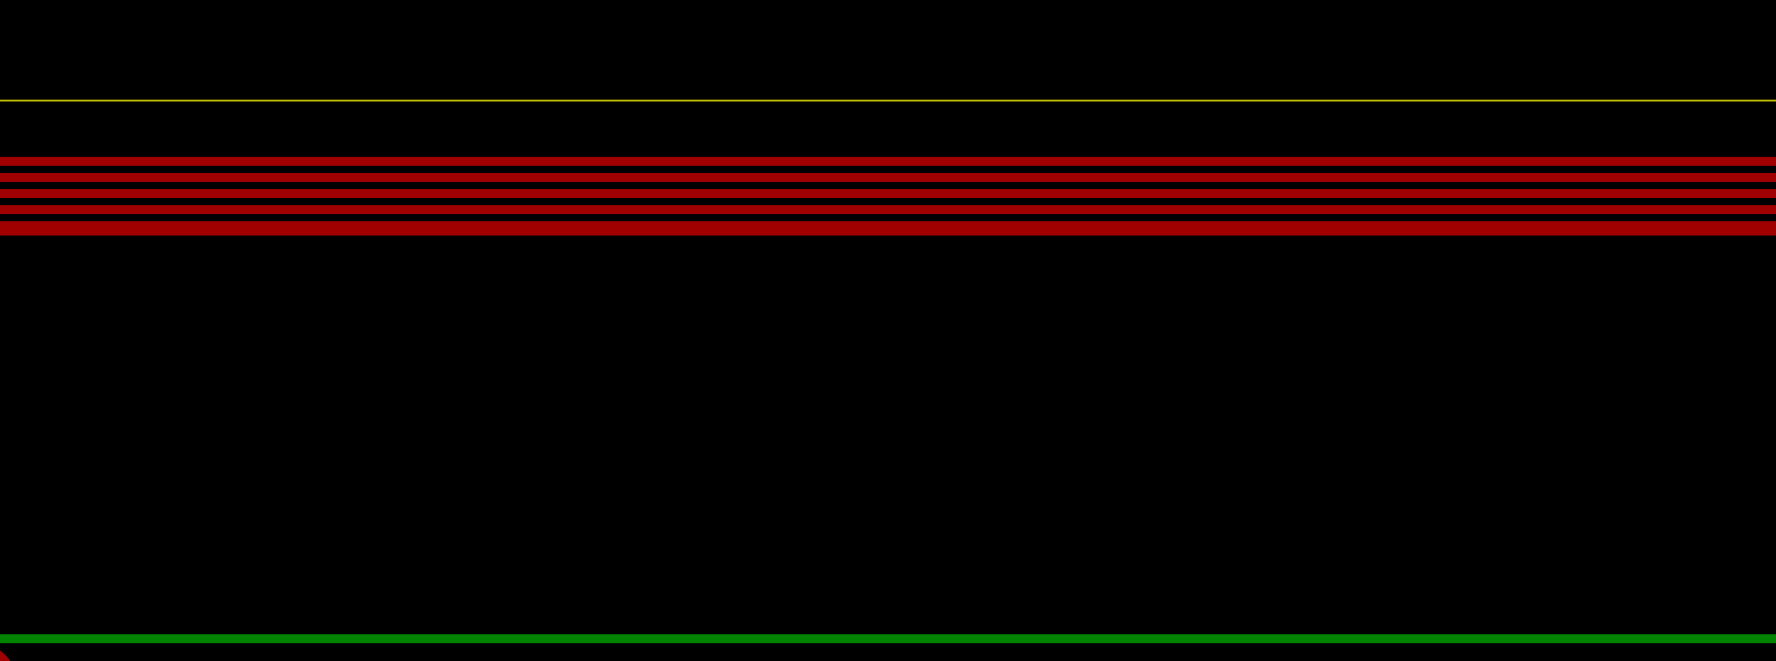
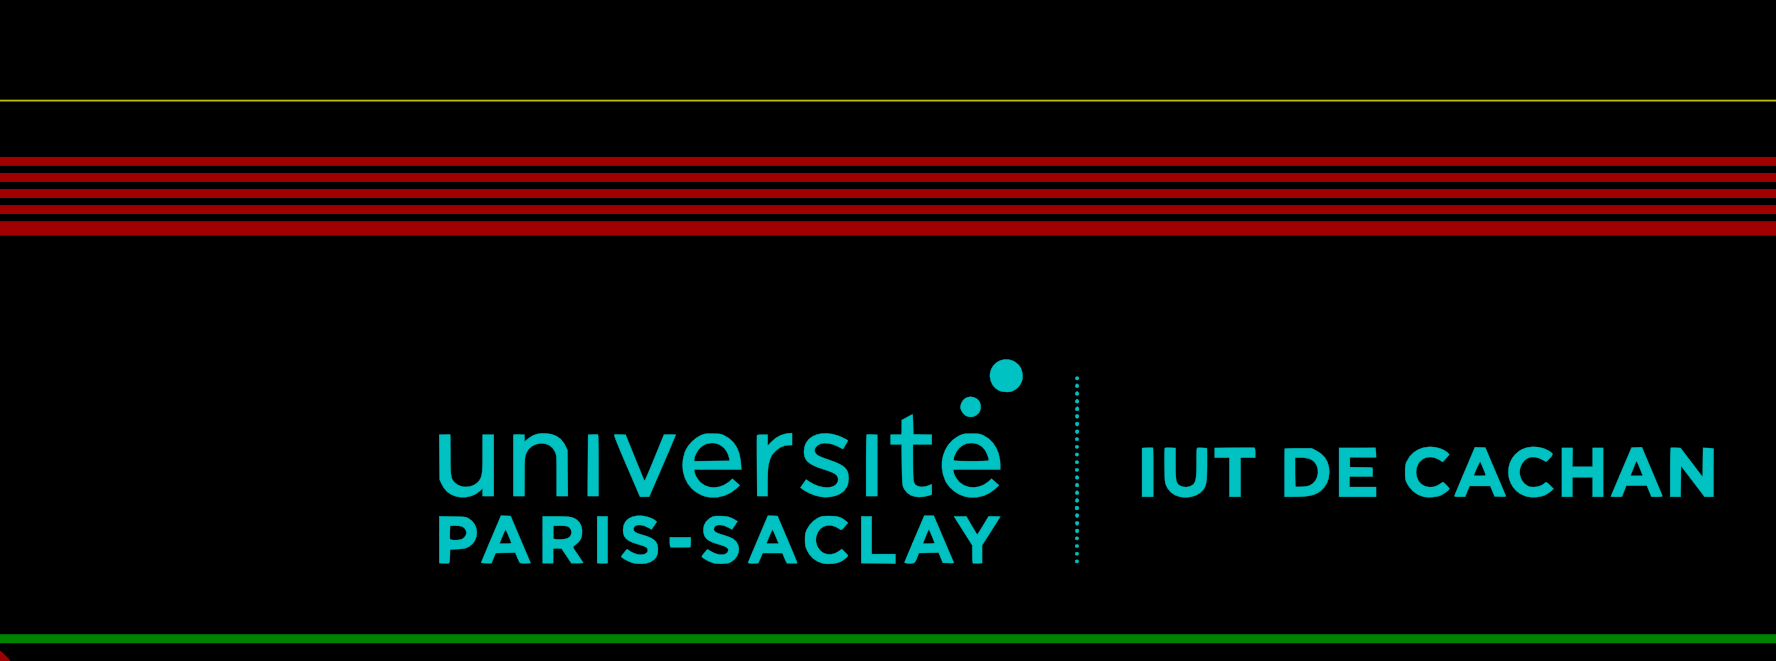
drawing: none -> [439, 359, 1714, 565]

